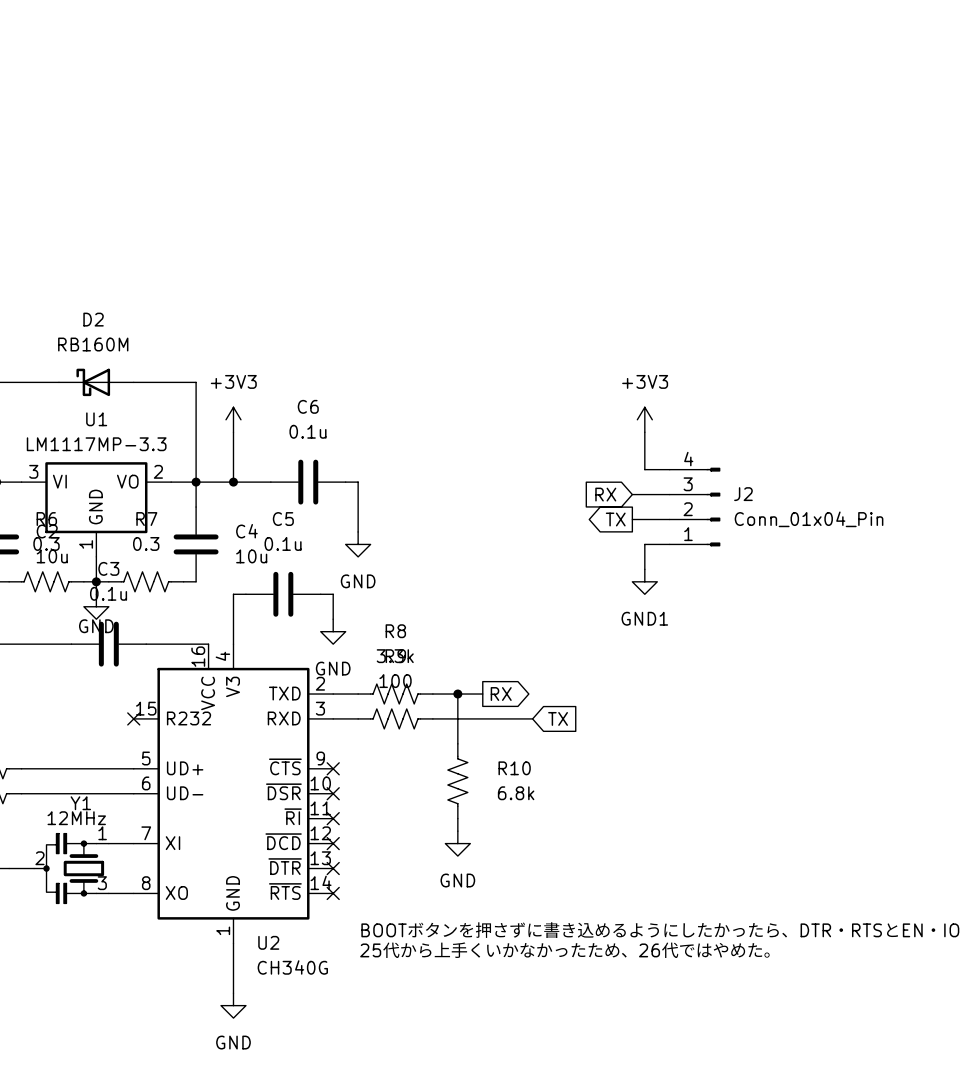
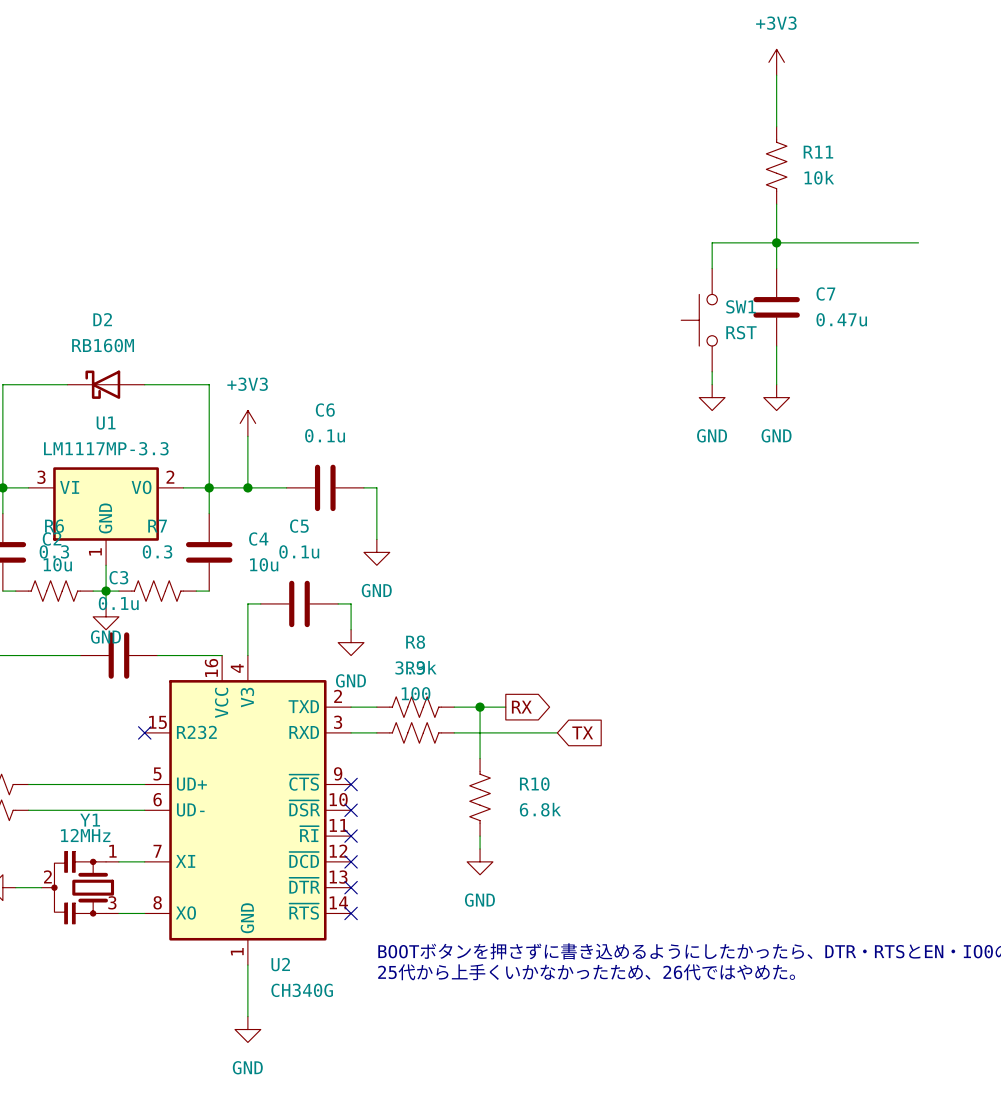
power symbol: none -> +3V3 (776, 62)
wire: none -> (776, 75) (776, 126)
R11: none -> 10k (776, 165)
wire: none -> (776, 204) (776, 268)
junction: none -> (776, 242)
wire: none -> (918, 242) (712, 242) (712, 268)
C7: none -> 0.47u (776, 307)
SW1: none -> RST (699, 320)
wire: none -> (776, 346) (776, 384)
wire: none -> (712, 371) (712, 384)
power symbol: none -> GND (712, 397)
power symbol: none -> GND (776, 397)
power symbol: +3V3 (644, 419) -> none
wire: (644, 432) (644, 469) (669, 469) -> none
global label: RX (605, 494) -> none
wire: (632, 494) (669, 494) -> none
J2: Conn_01x04_Pin (695, 507) -> none
global label: TX (615, 519) -> none
wire: (632, 519) (669, 519) -> none
wire: (669, 544) (644, 544) (644, 569) -> none
power symbol: GND1 (644, 581) -> none

